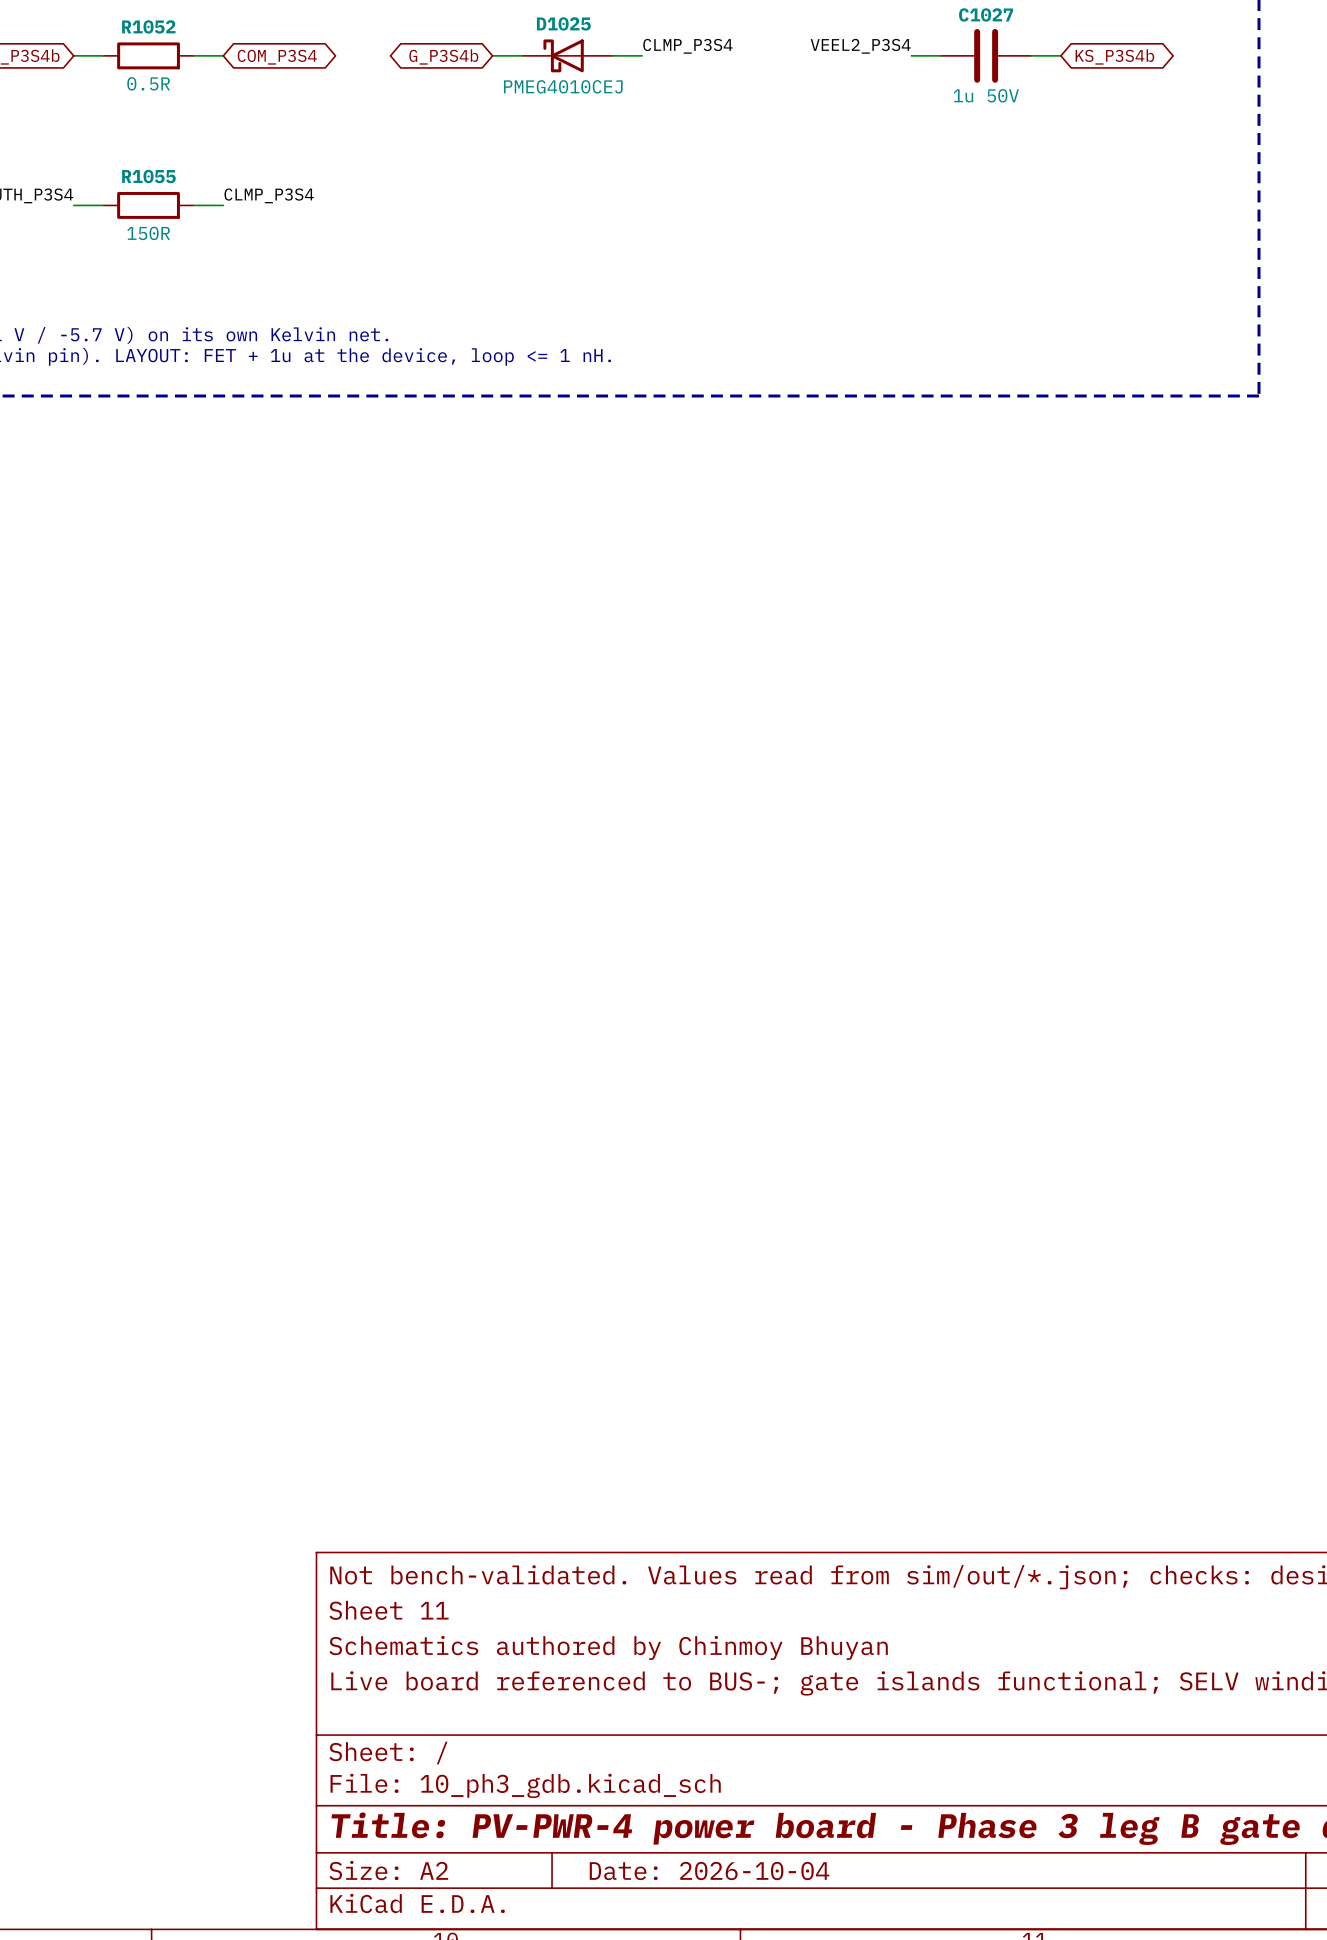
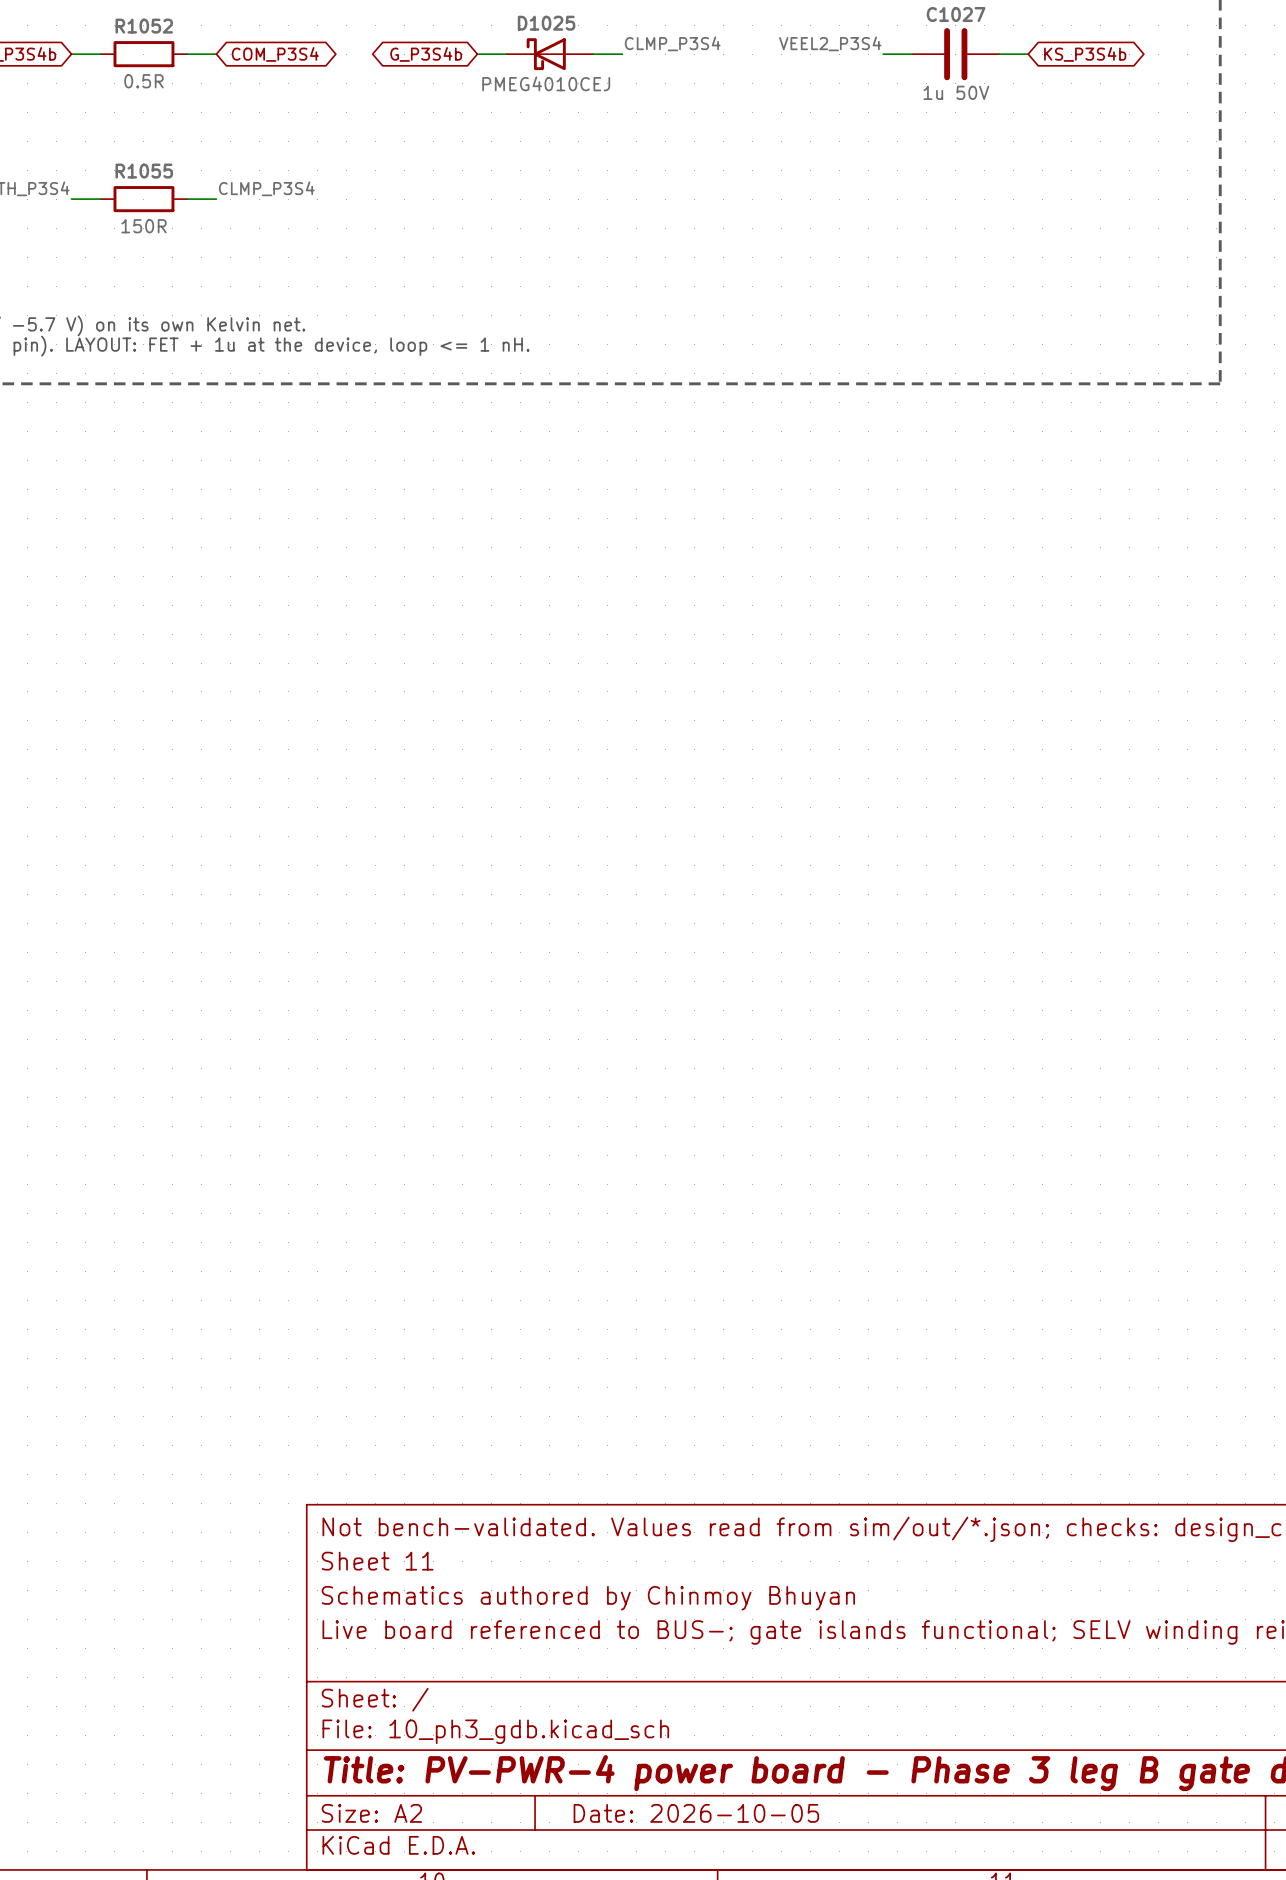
title block: Date: 2026-10-04 (709, 1871) -> Date: 2026-10-05 (696, 1813)

